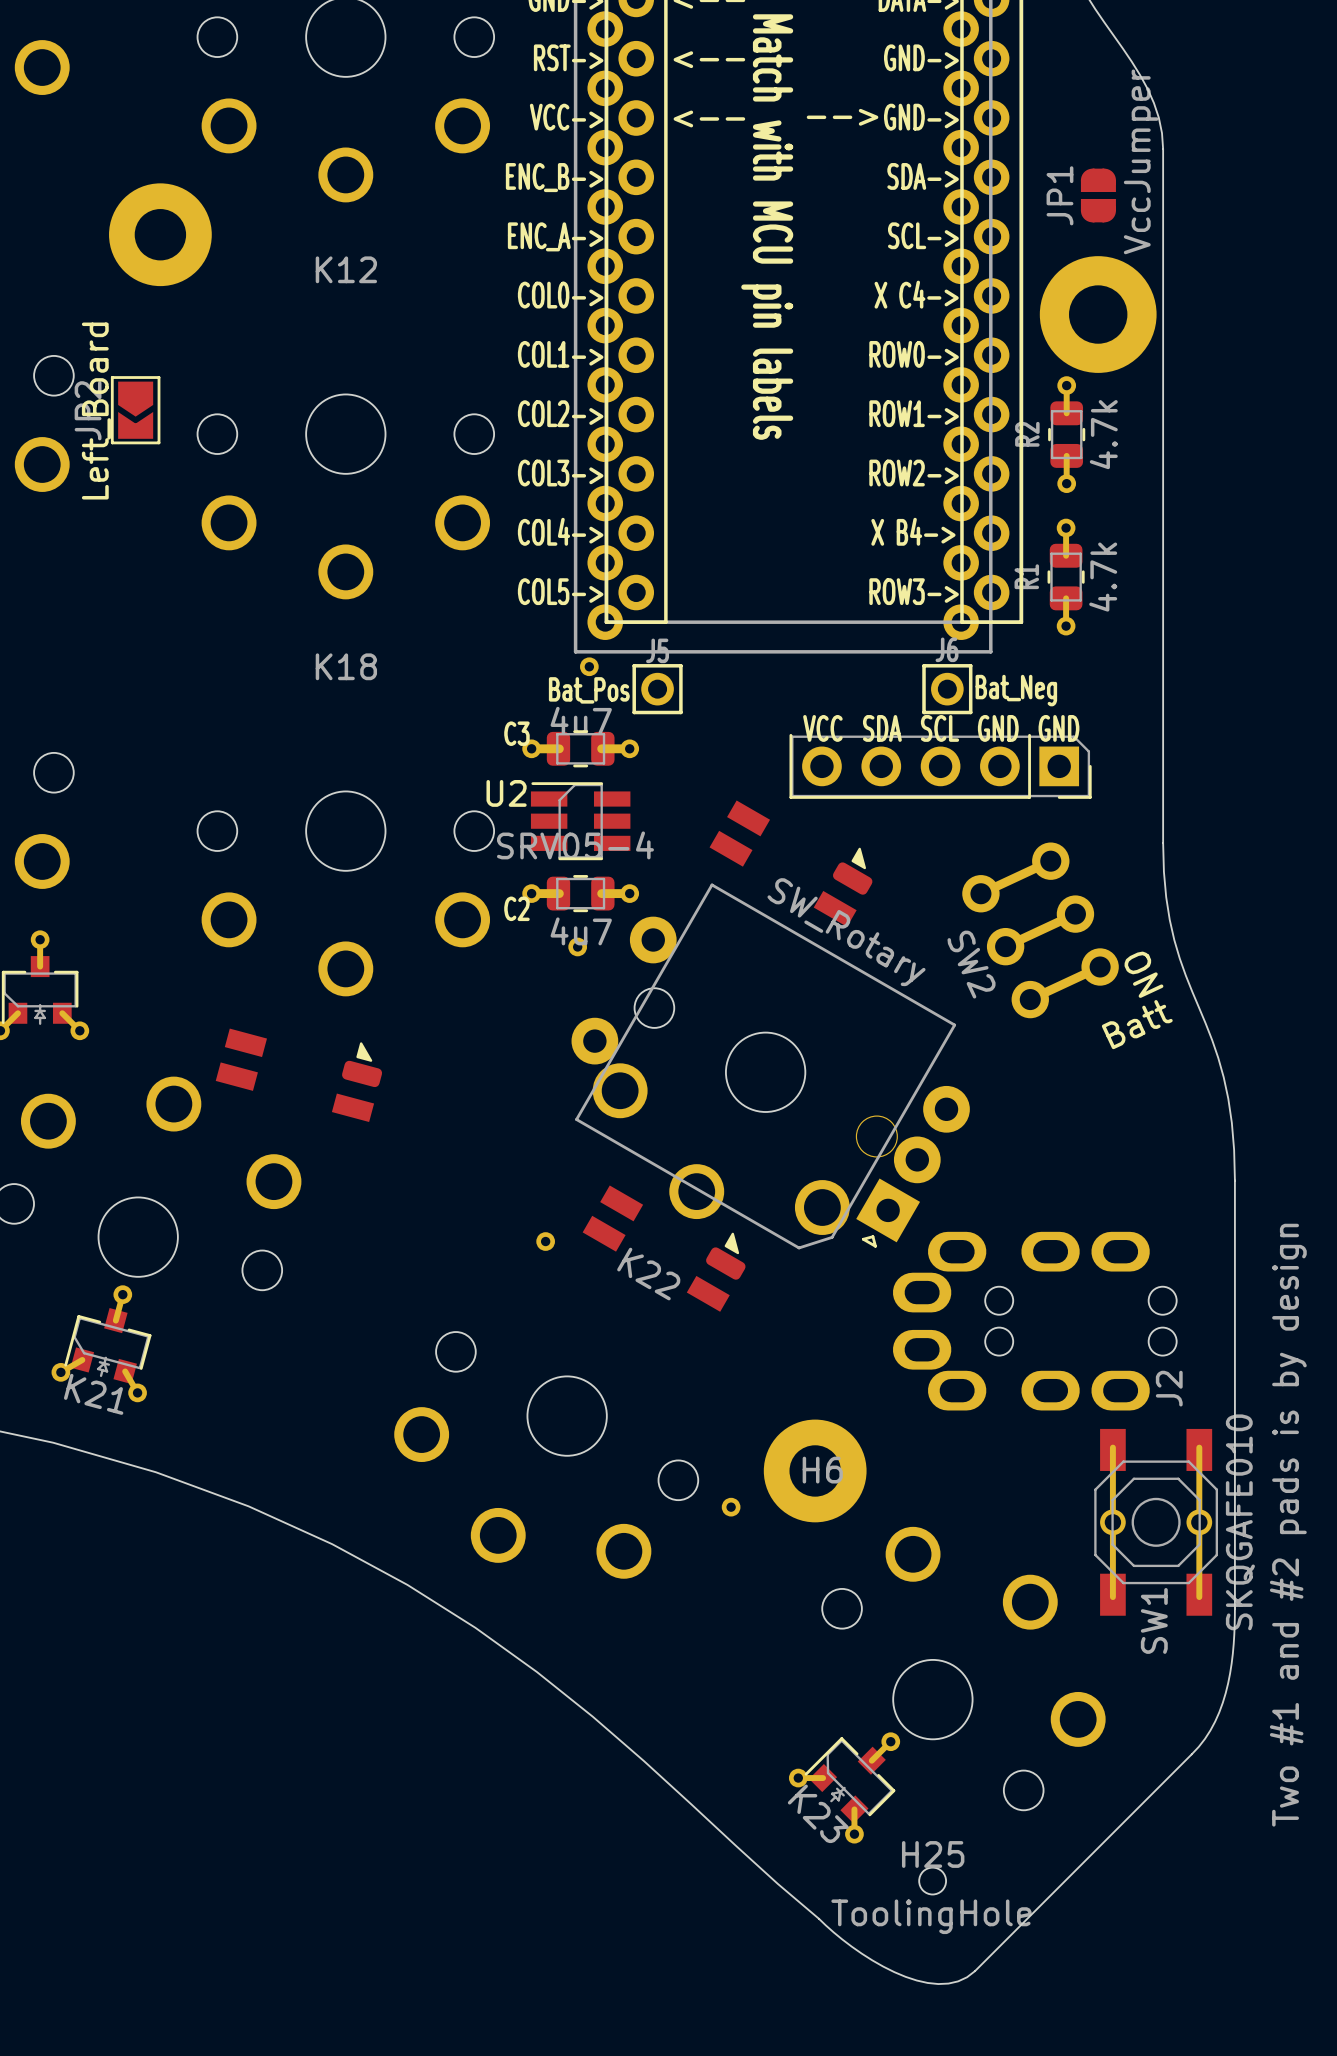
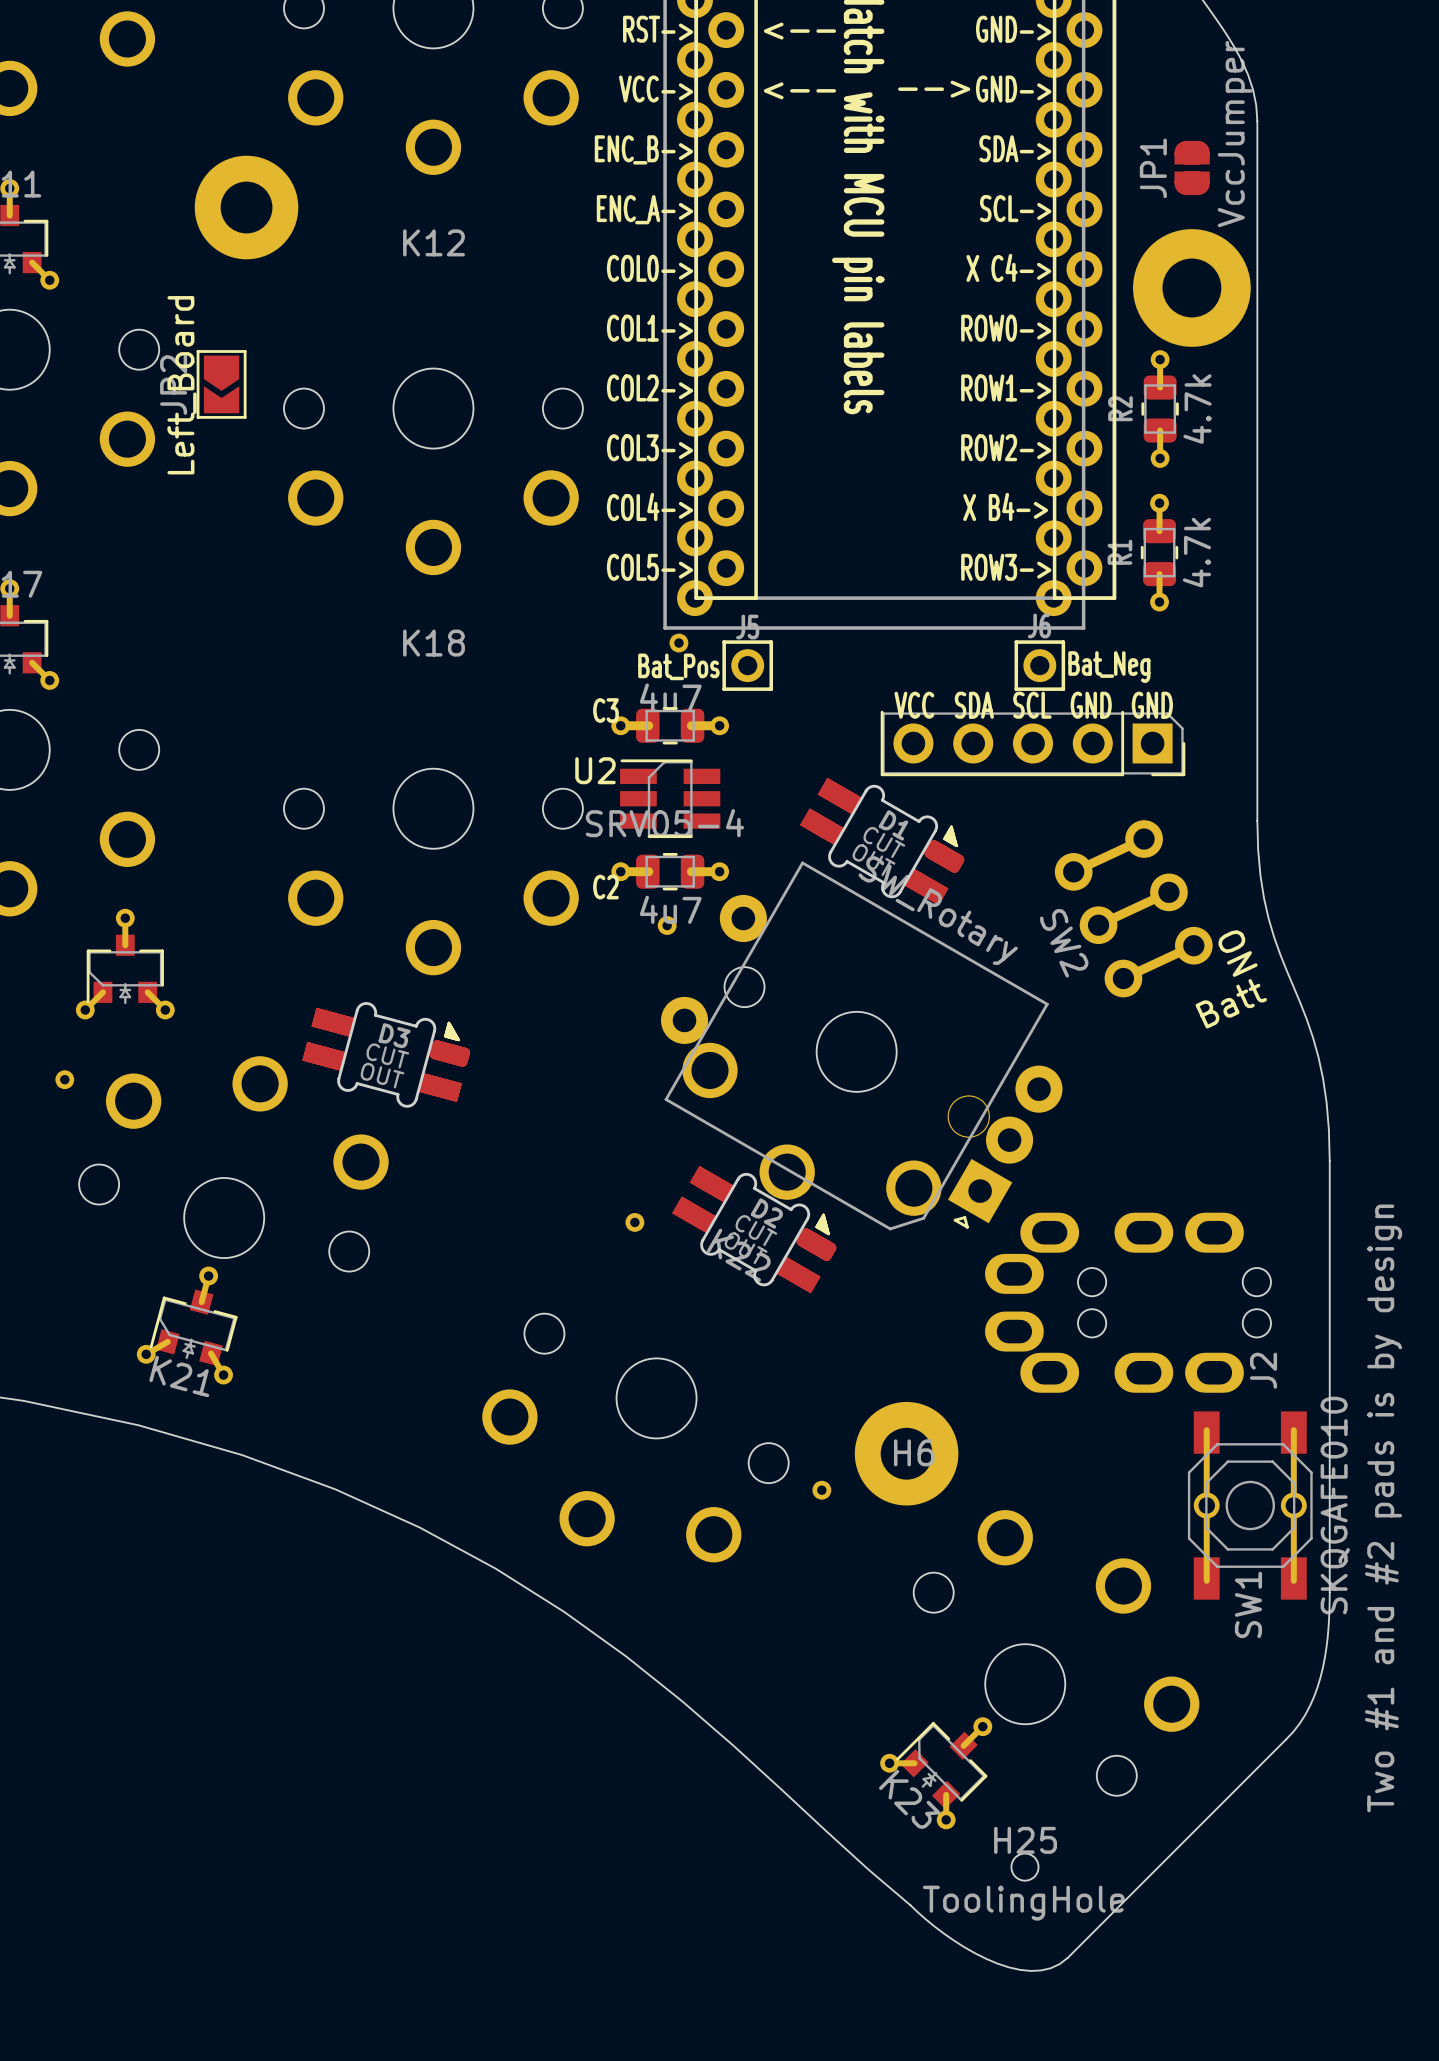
D1: none -> (882, 841)
D3: none -> (386, 1054)
D2: none -> (754, 1229)

